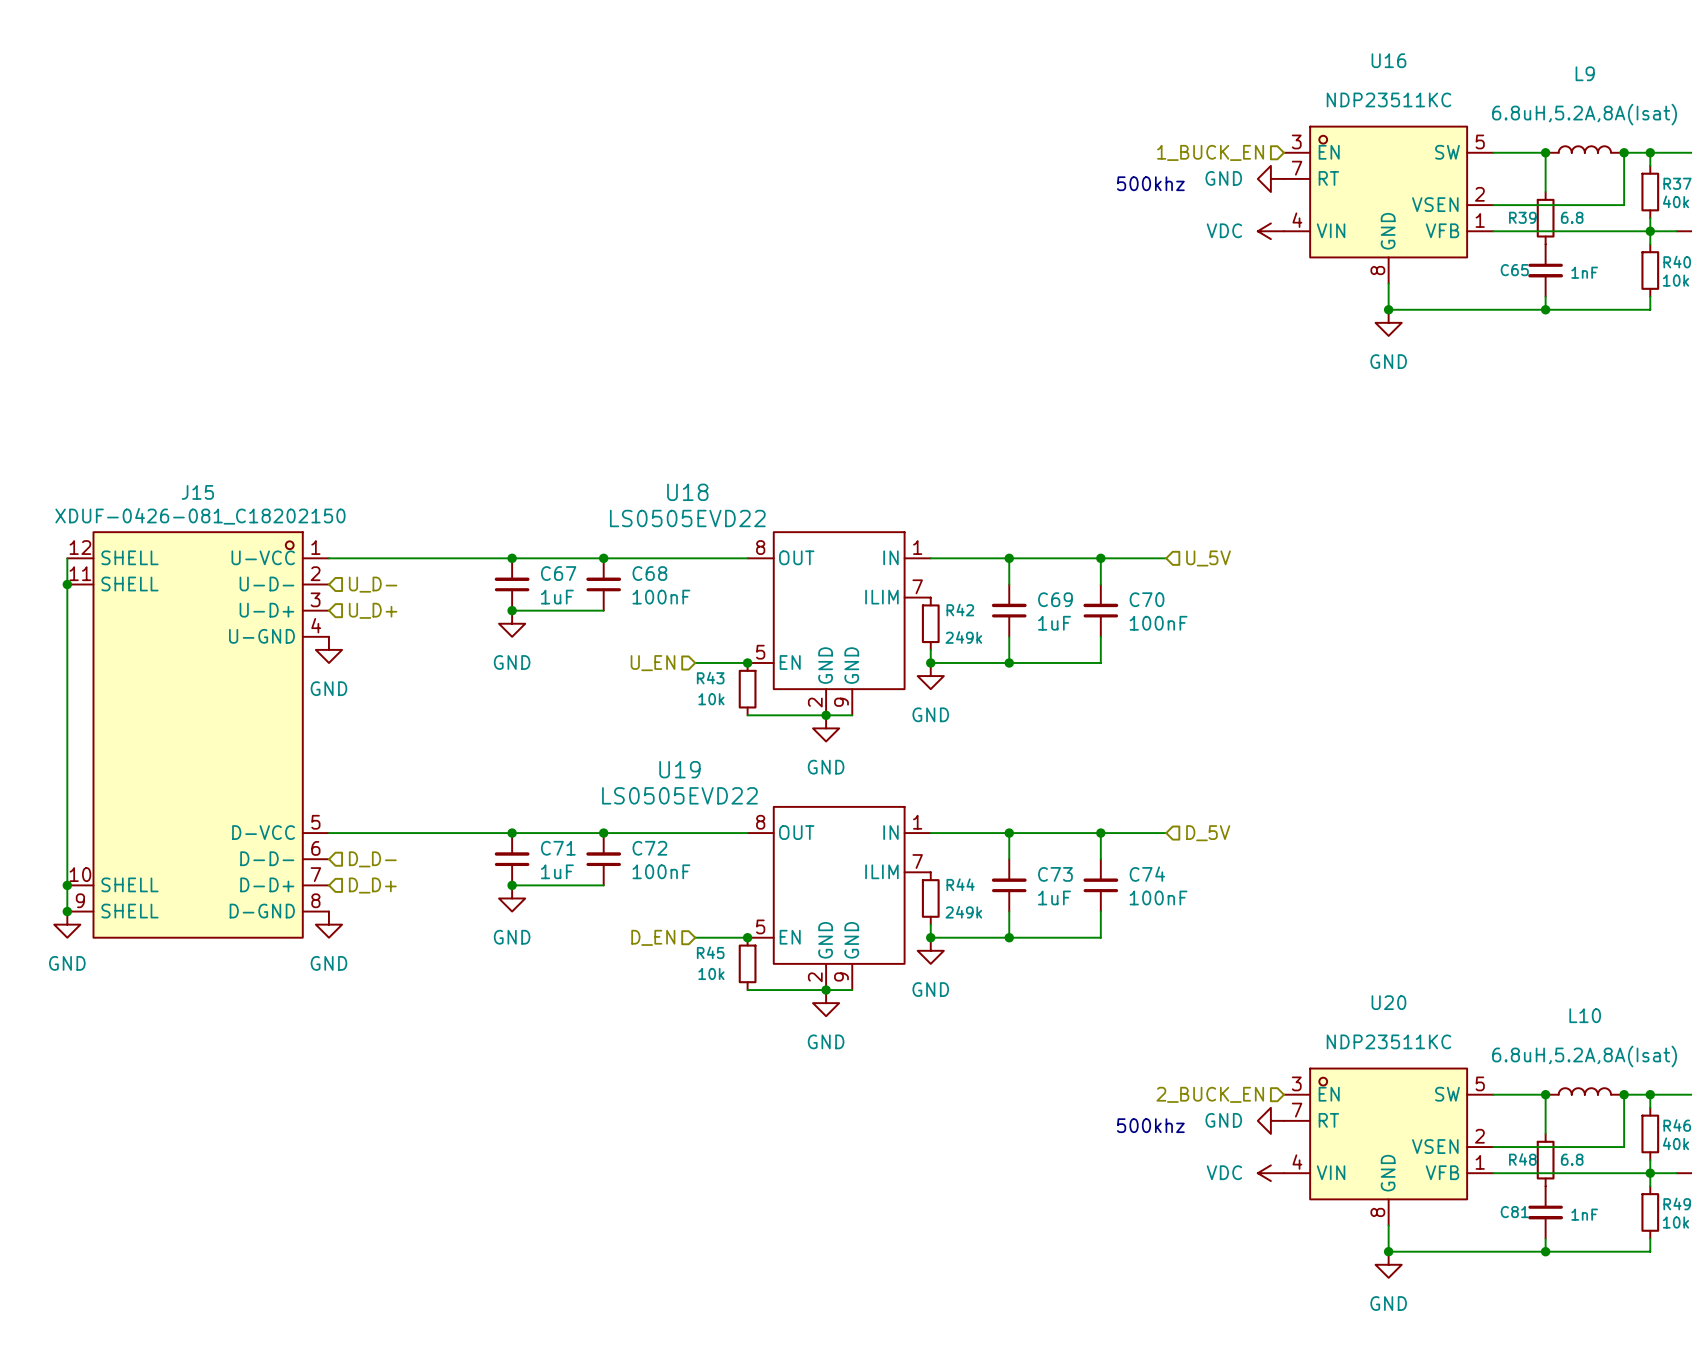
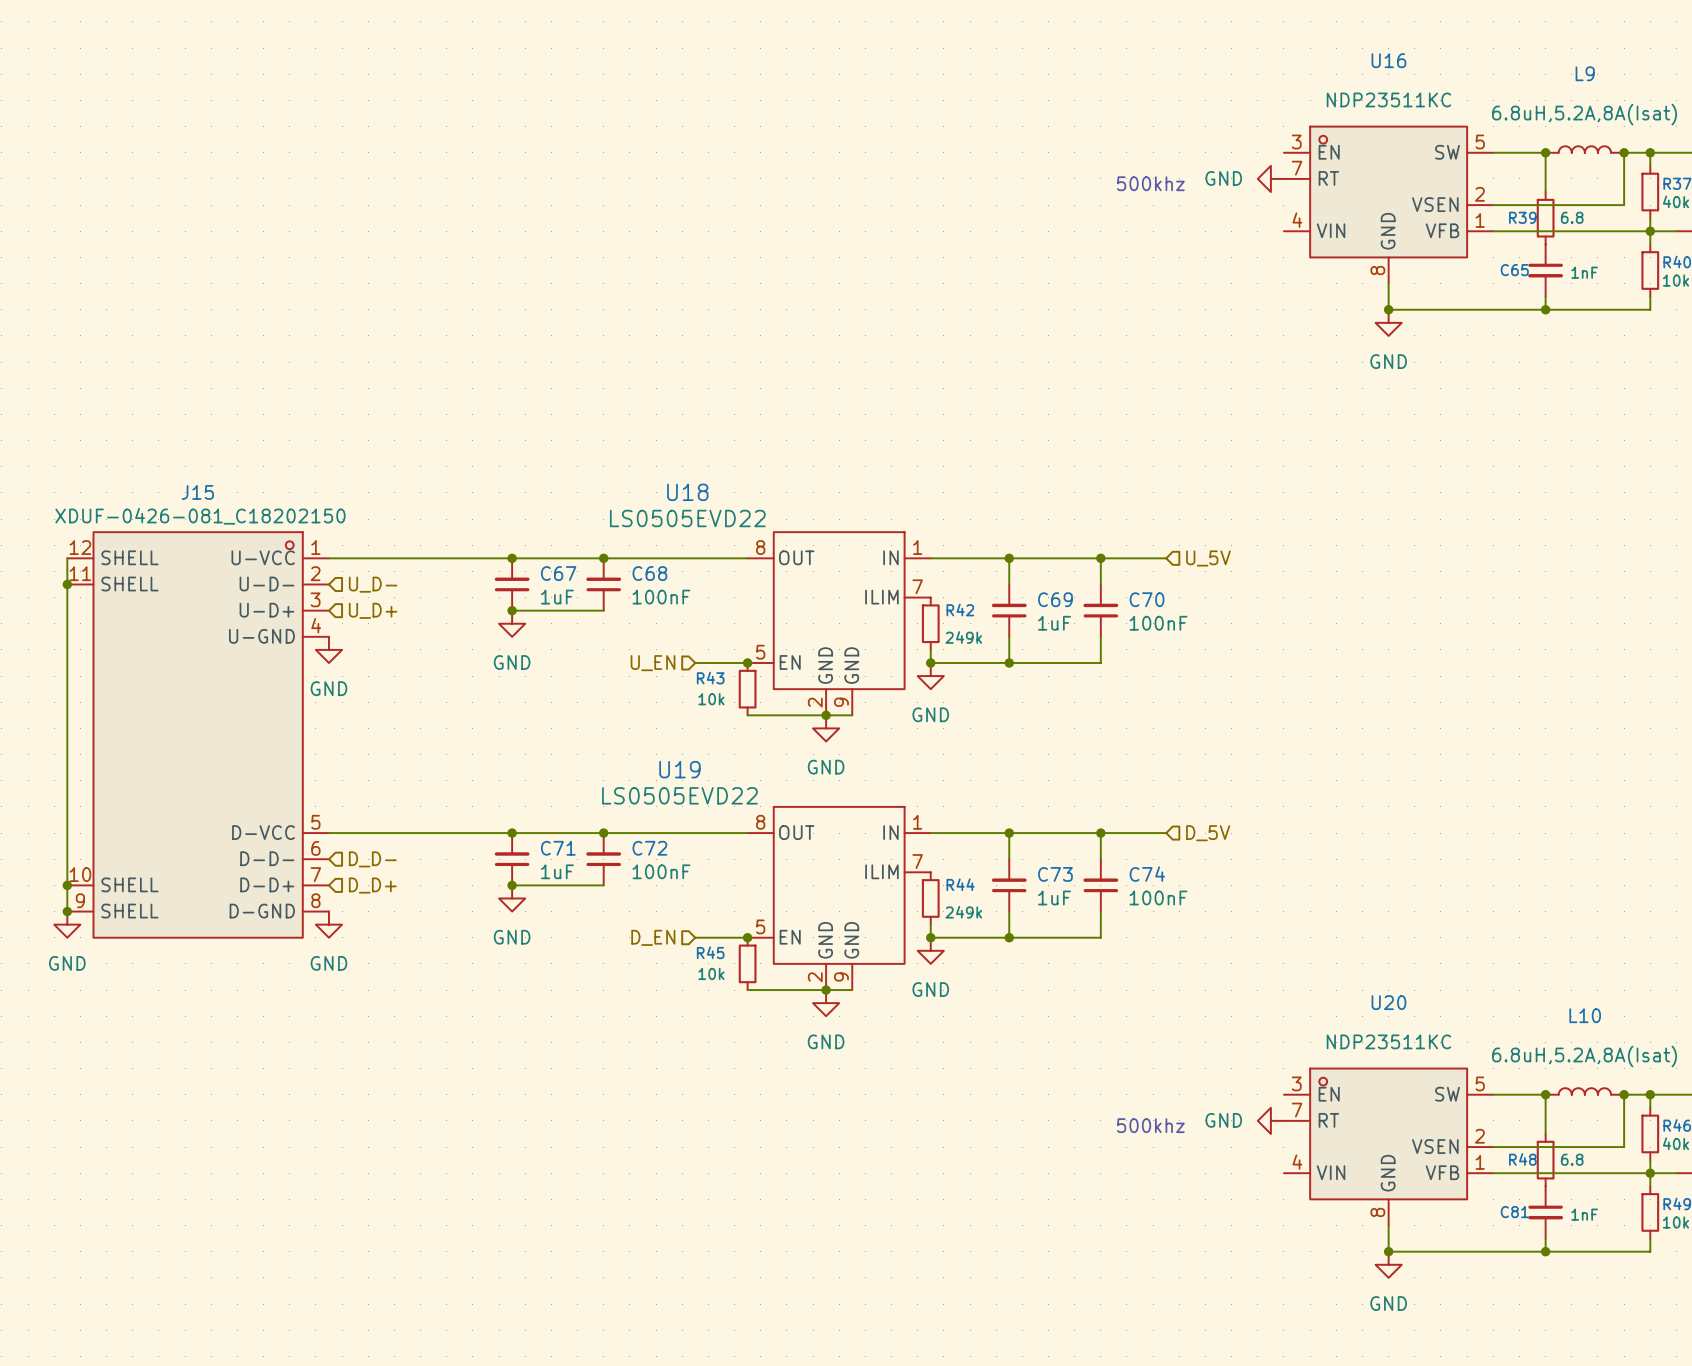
hierarchical label: 1_BUCK_EN (1210, 152) -> none
power symbol: VDC (1270, 231) -> none
hierarchical label: 2_BUCK_EN (1210, 1094) -> none
power symbol: VDC (1270, 1173) -> none

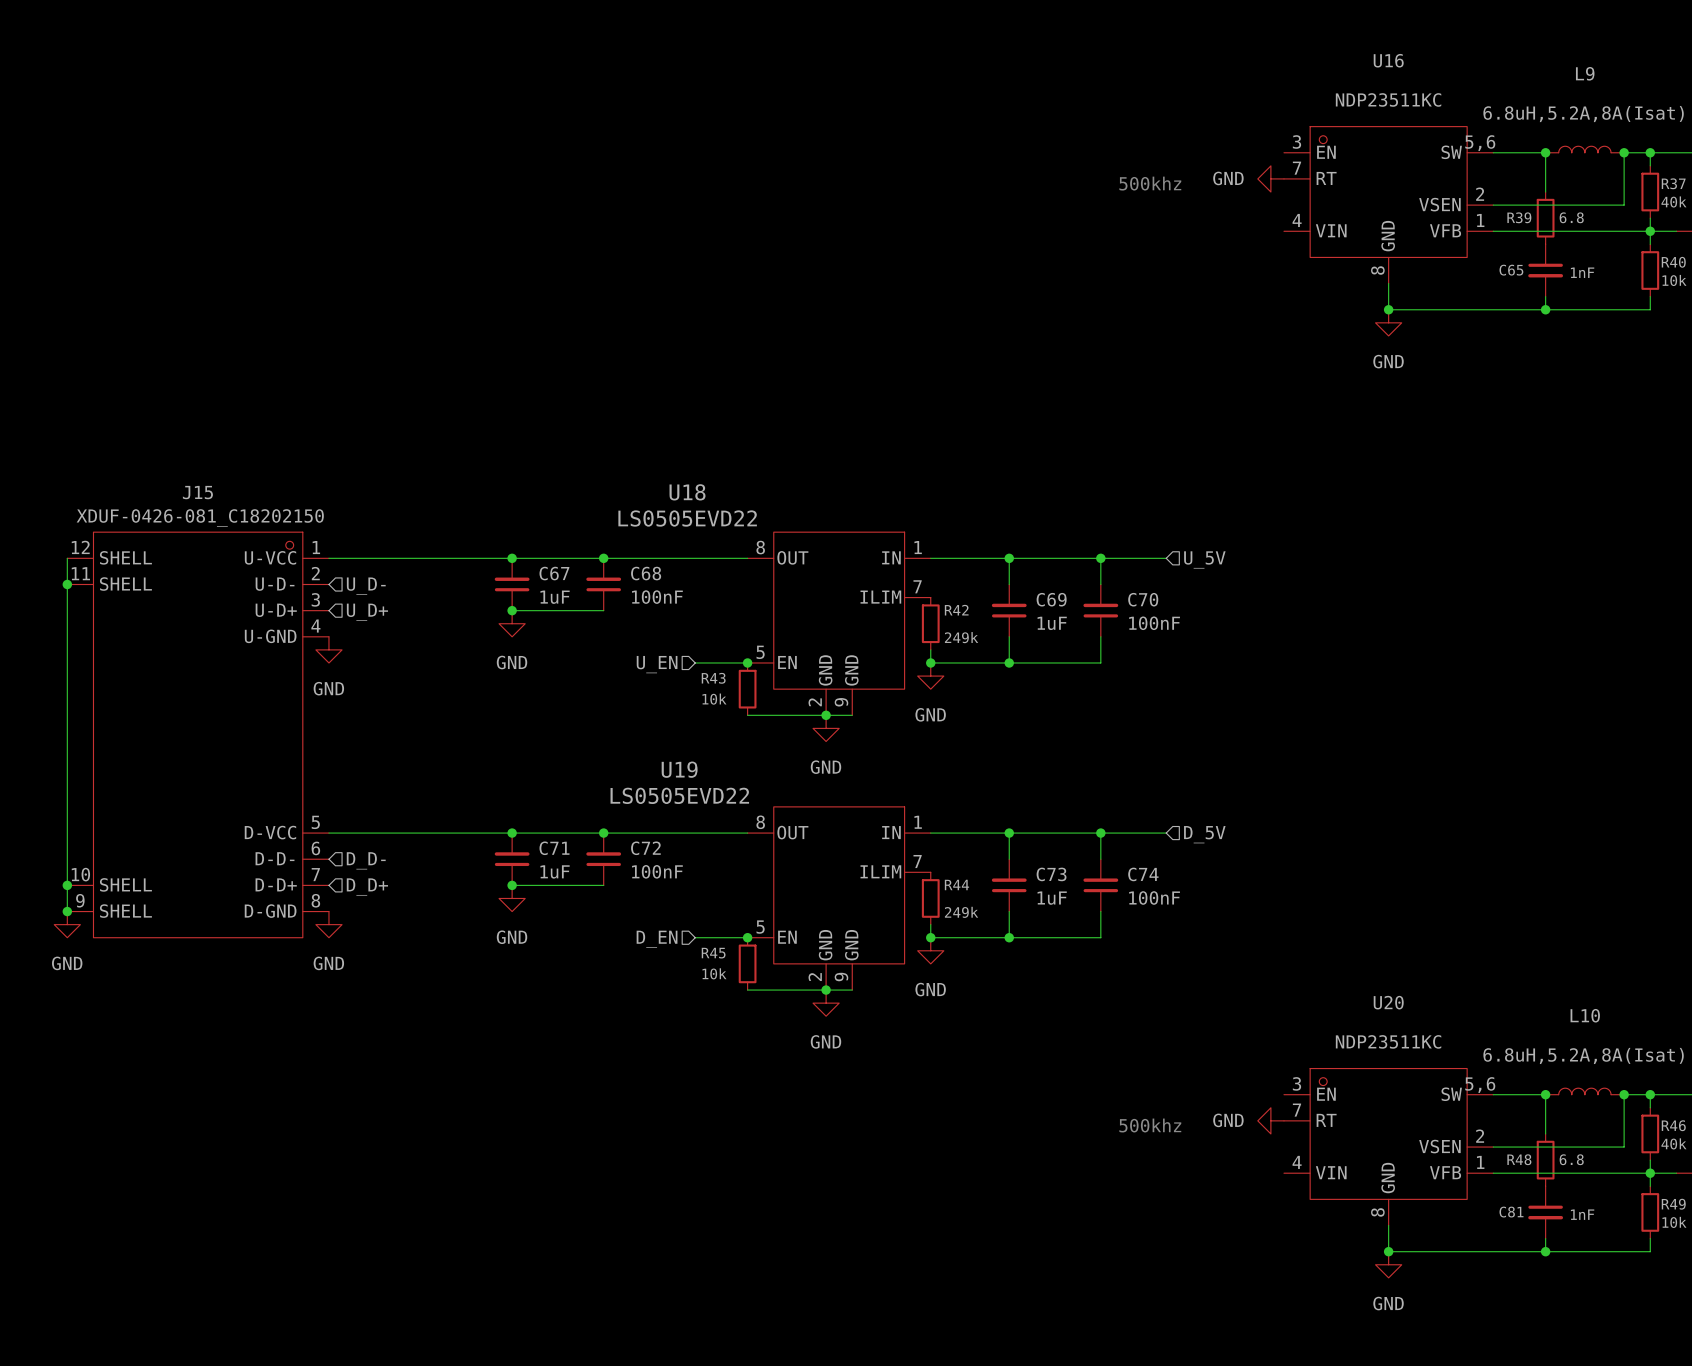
U16 pin number: 5 (1480, 141) -> 5,6 (1480, 143)
U20 pin number: 5 (1480, 1083) -> 5,6 (1480, 1085)

